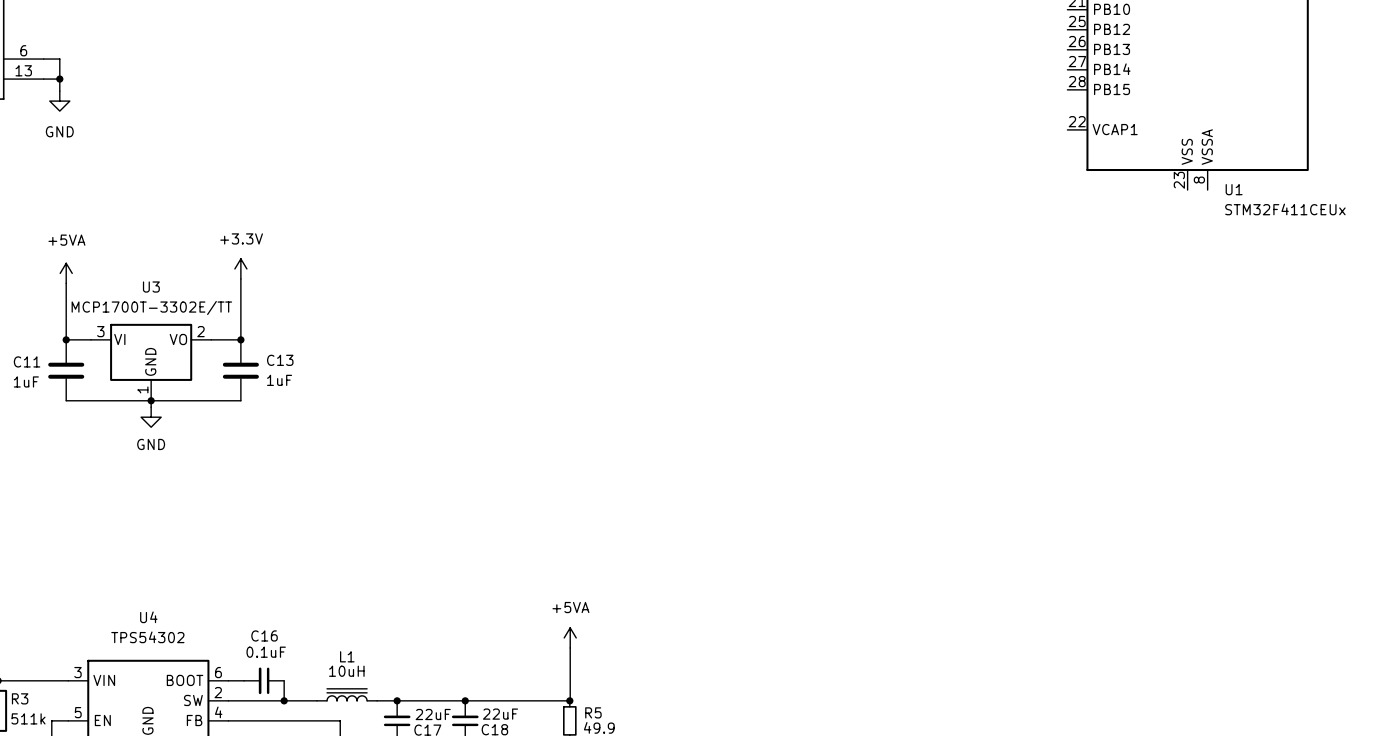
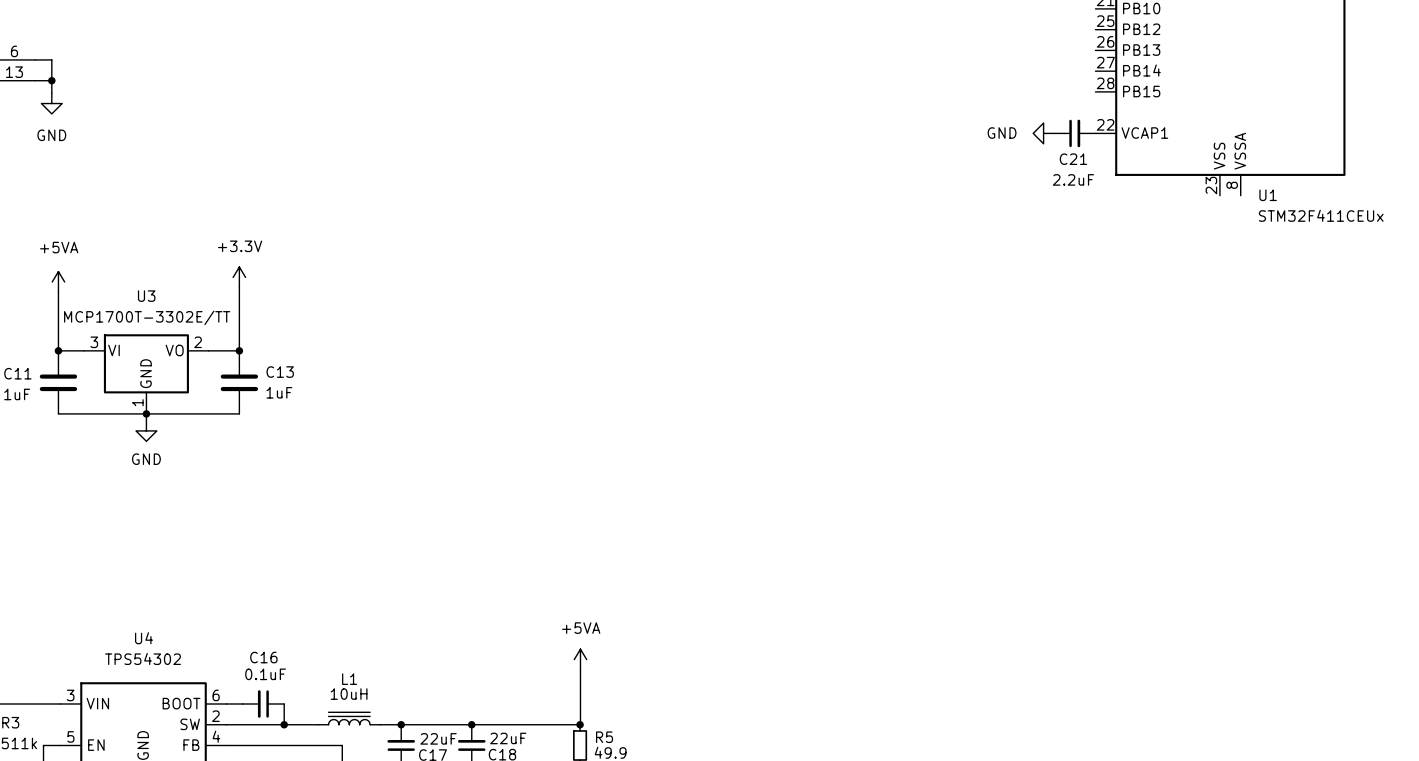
power symbol: none -> GND (1043, 133)
C21: none -> 2.2uF (1074, 133)

